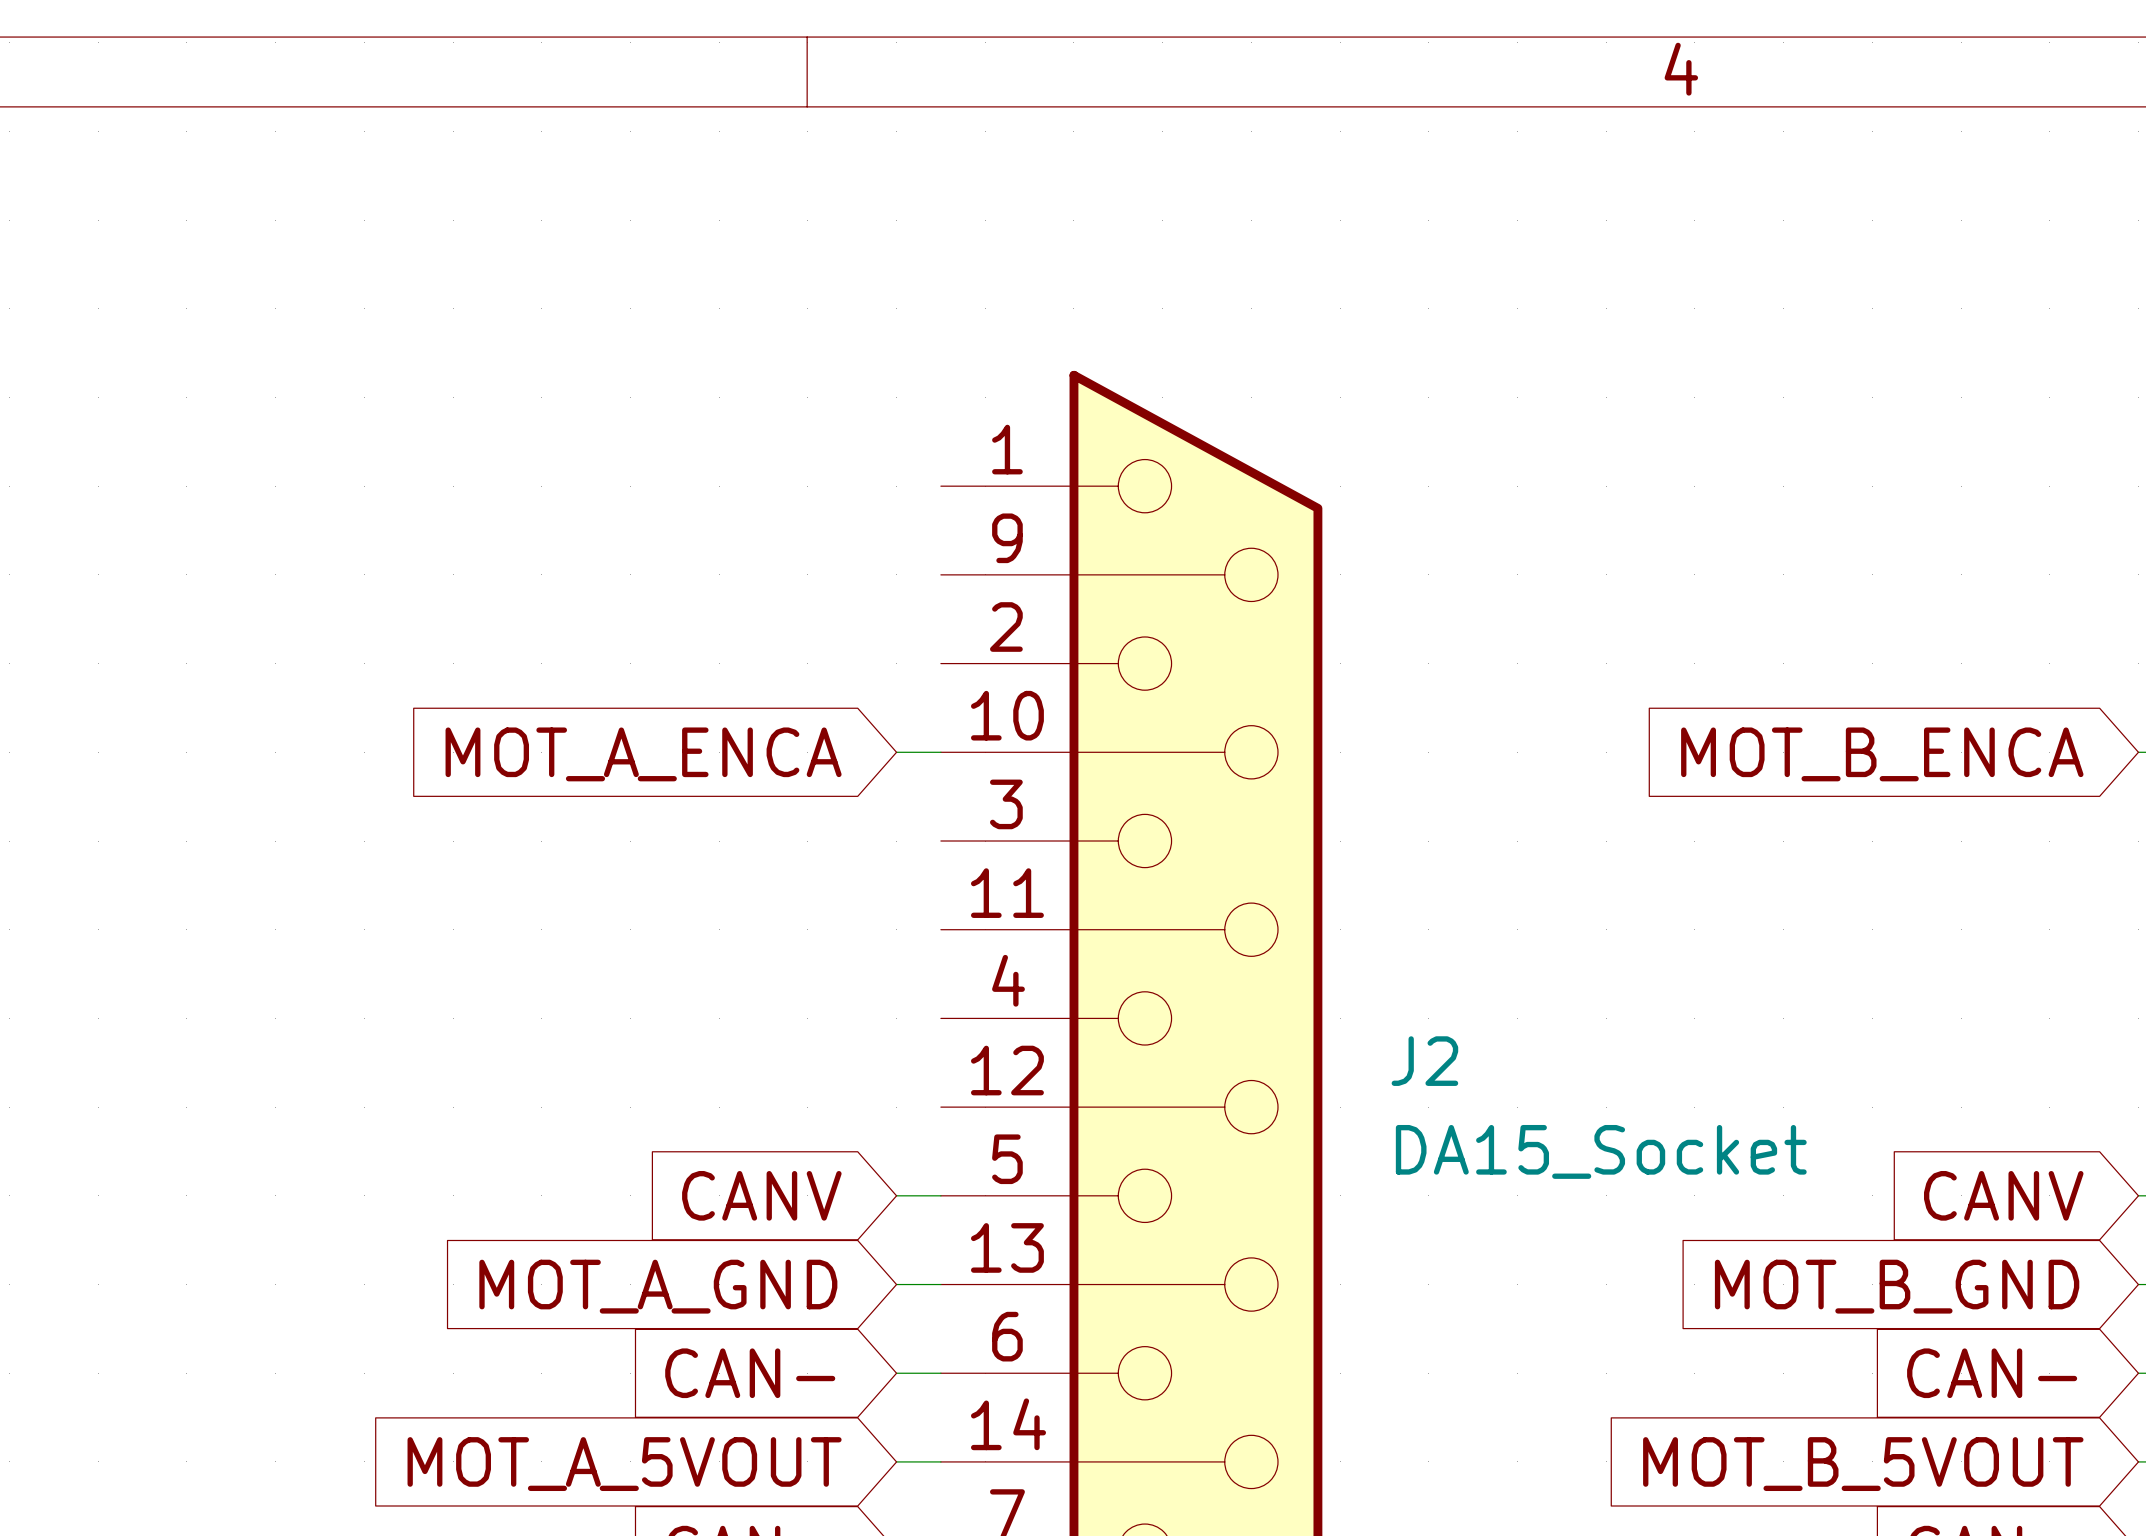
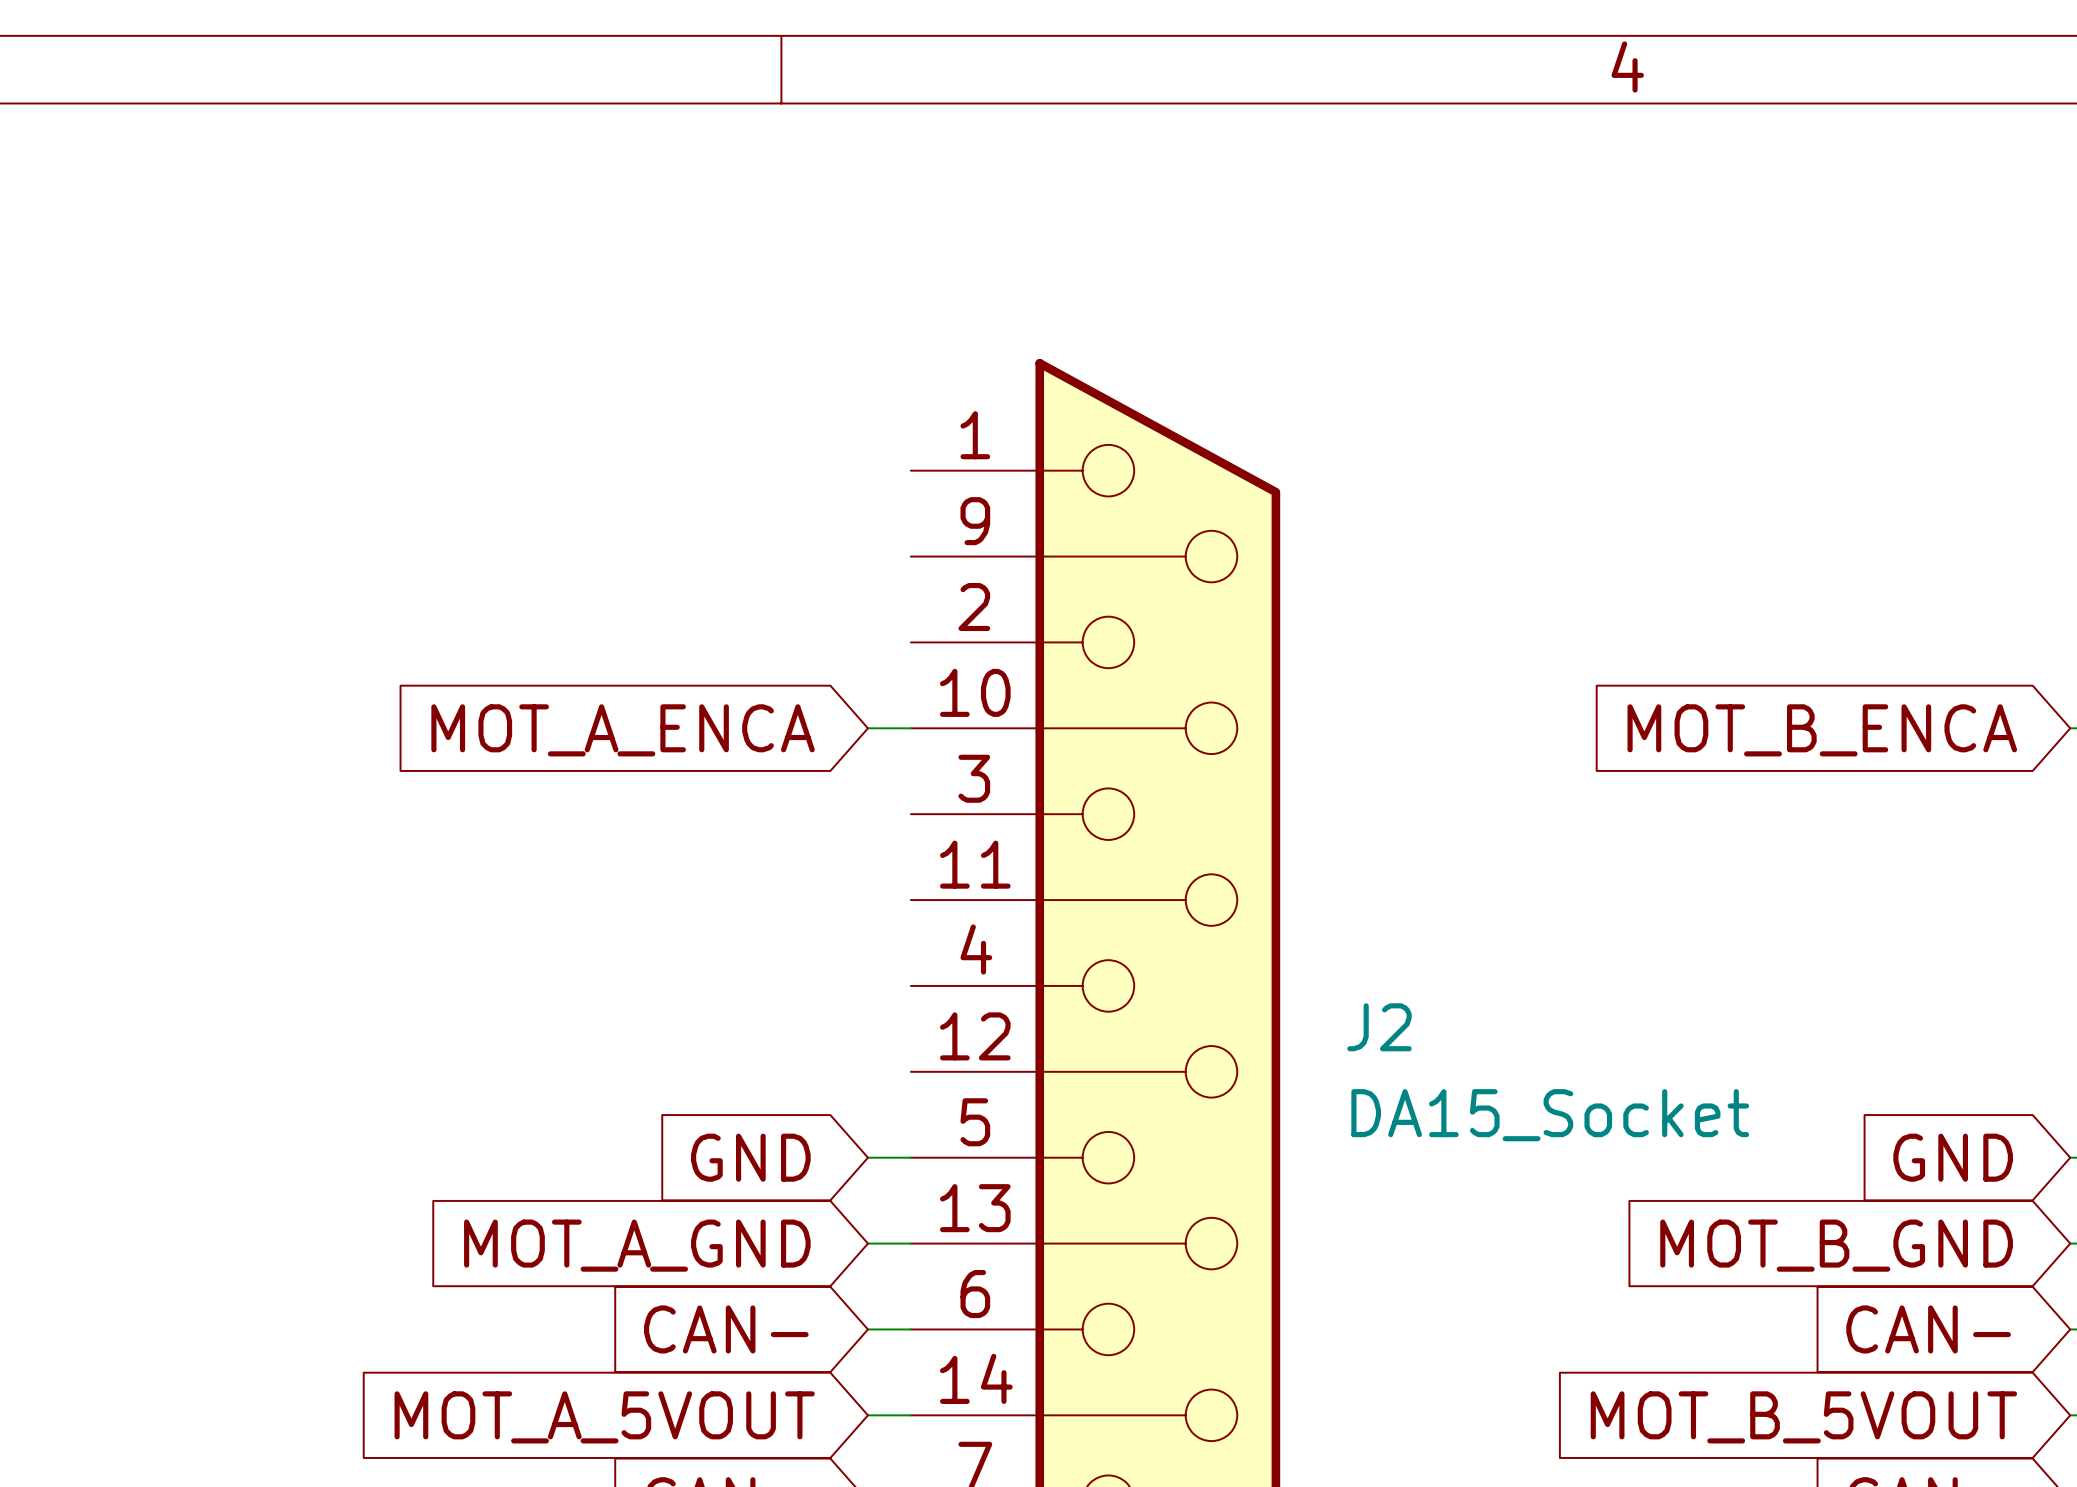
global label: CANV (761, 1195) -> GND (750, 1157)
global label: CANV (2003, 1195) -> GND (1953, 1157)

